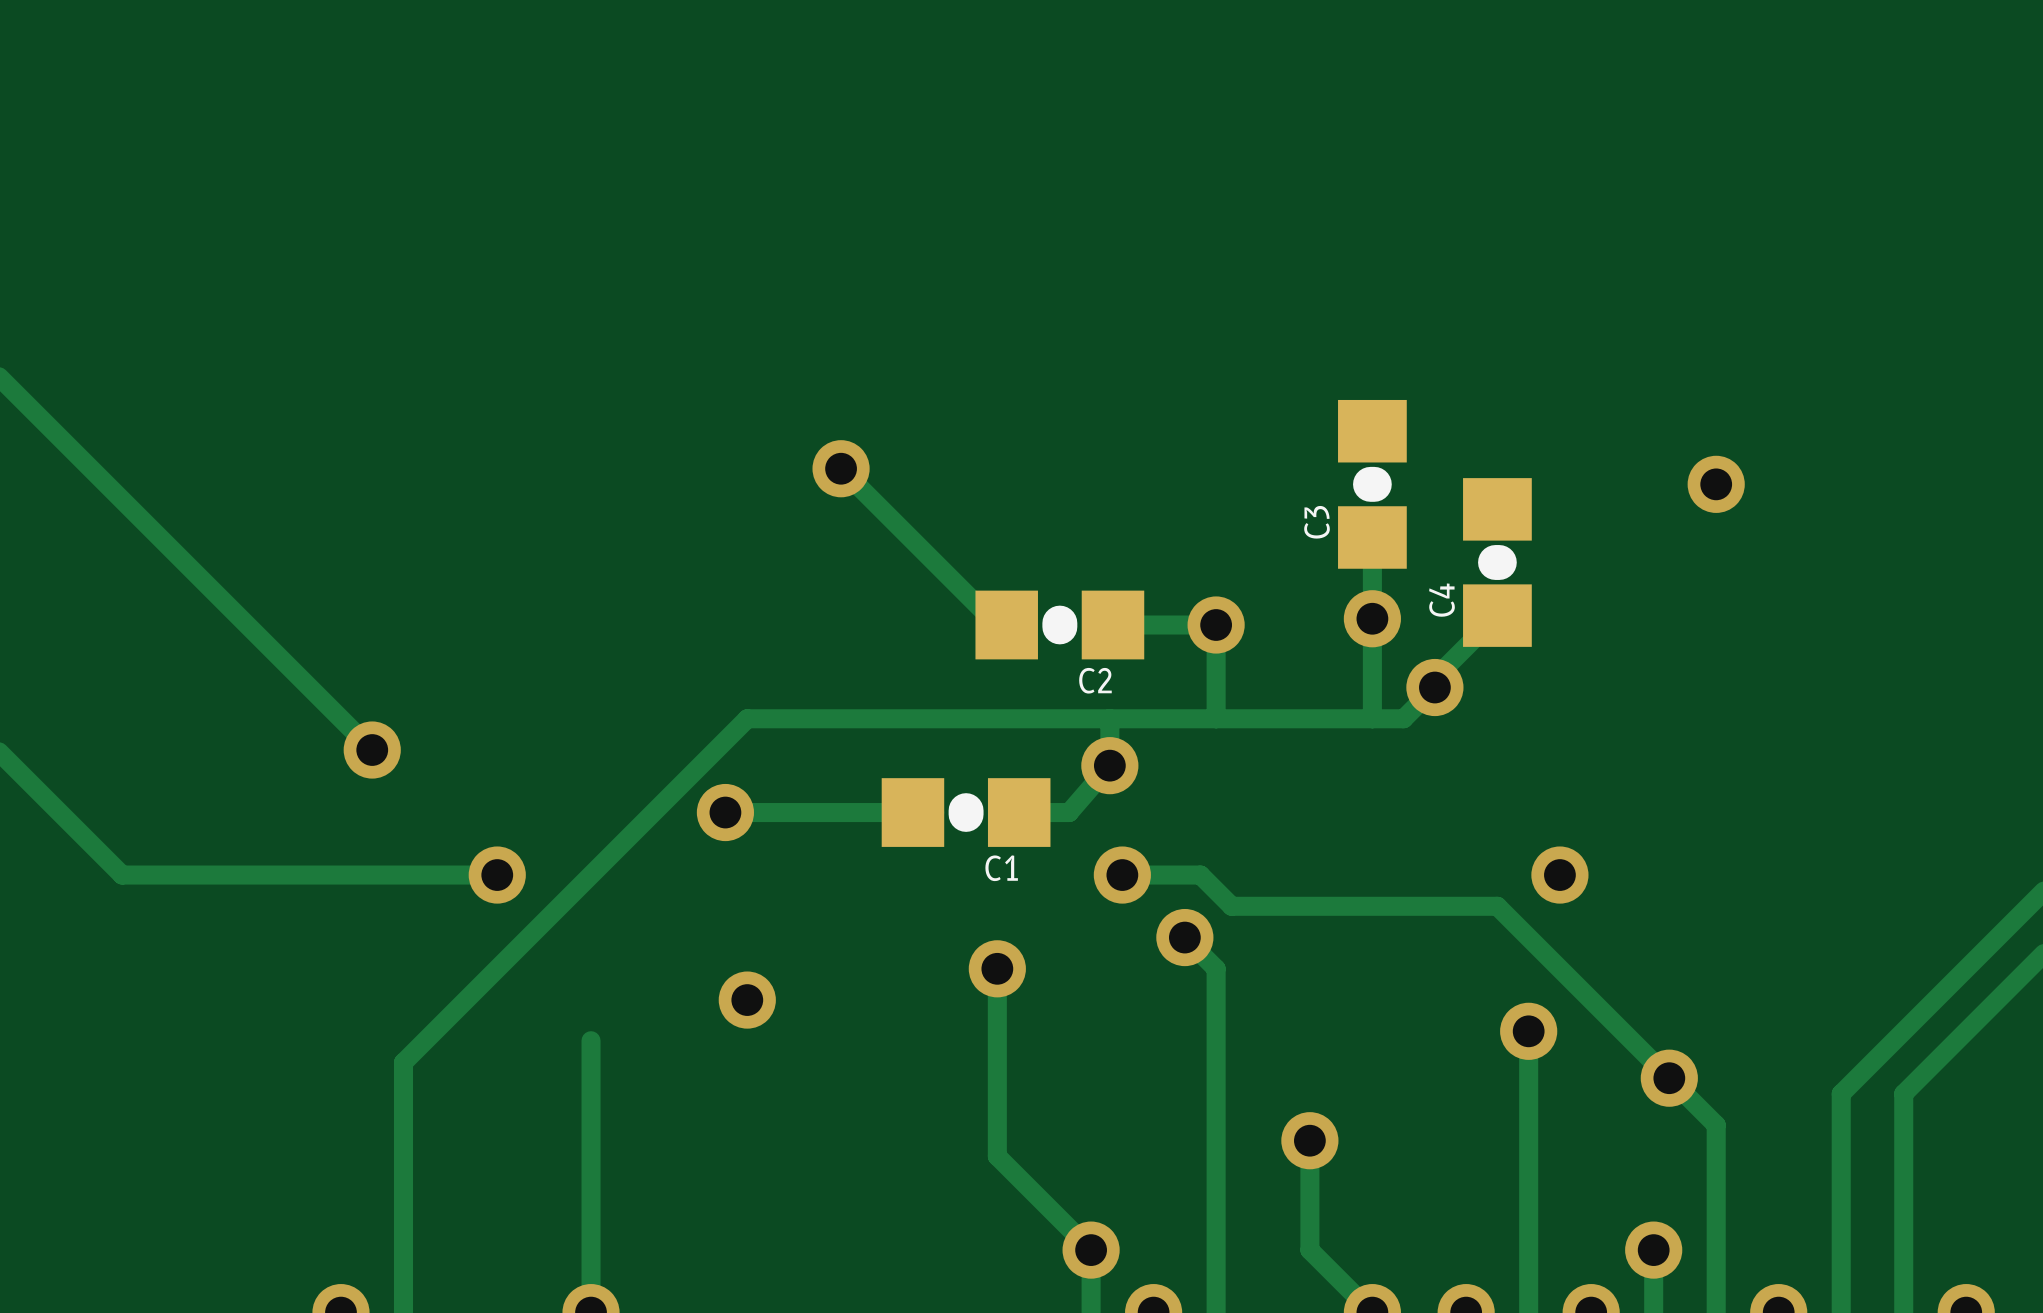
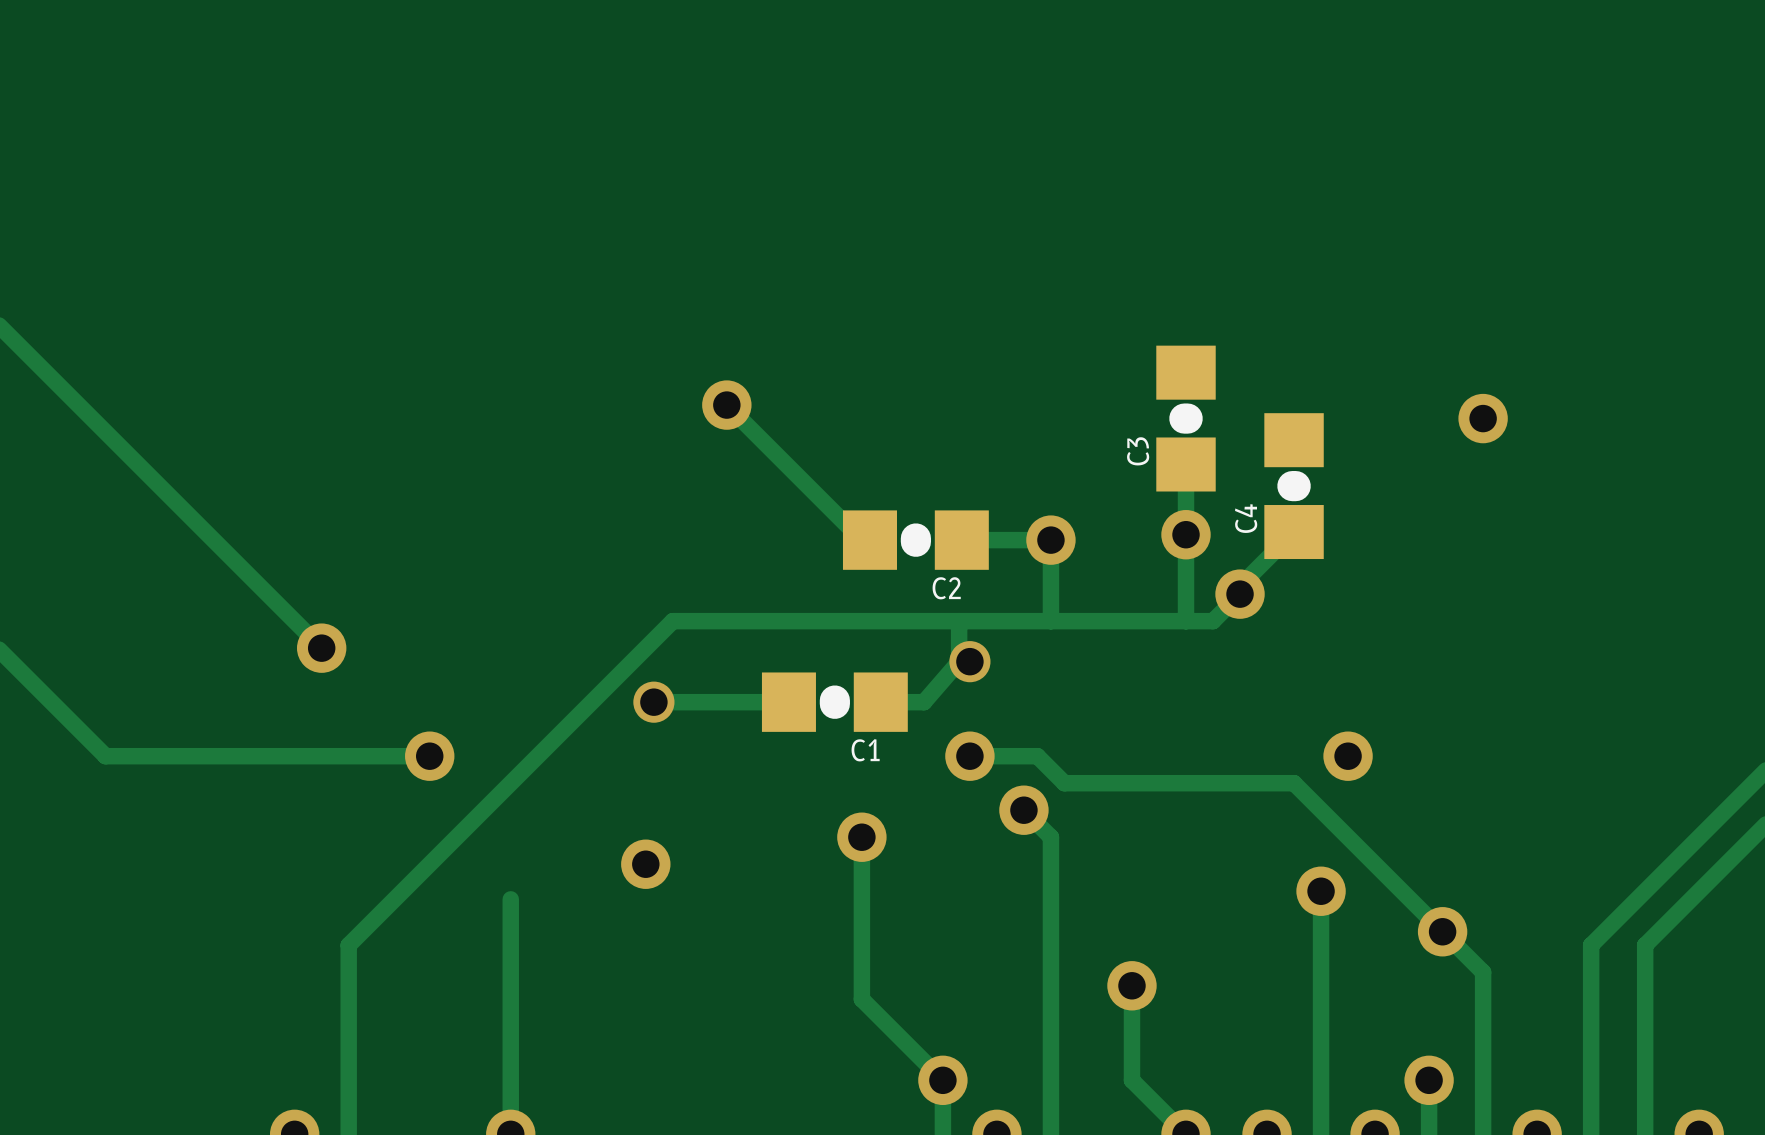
track: (778, 718) (747, 718) (403, 1062) (403, 1093) -> (672, 621) (348, 945)
via size: [1081, 737, 1139, 795] -> [949, 641, 991, 683]
via position: (725, 812) -> (653, 702)

